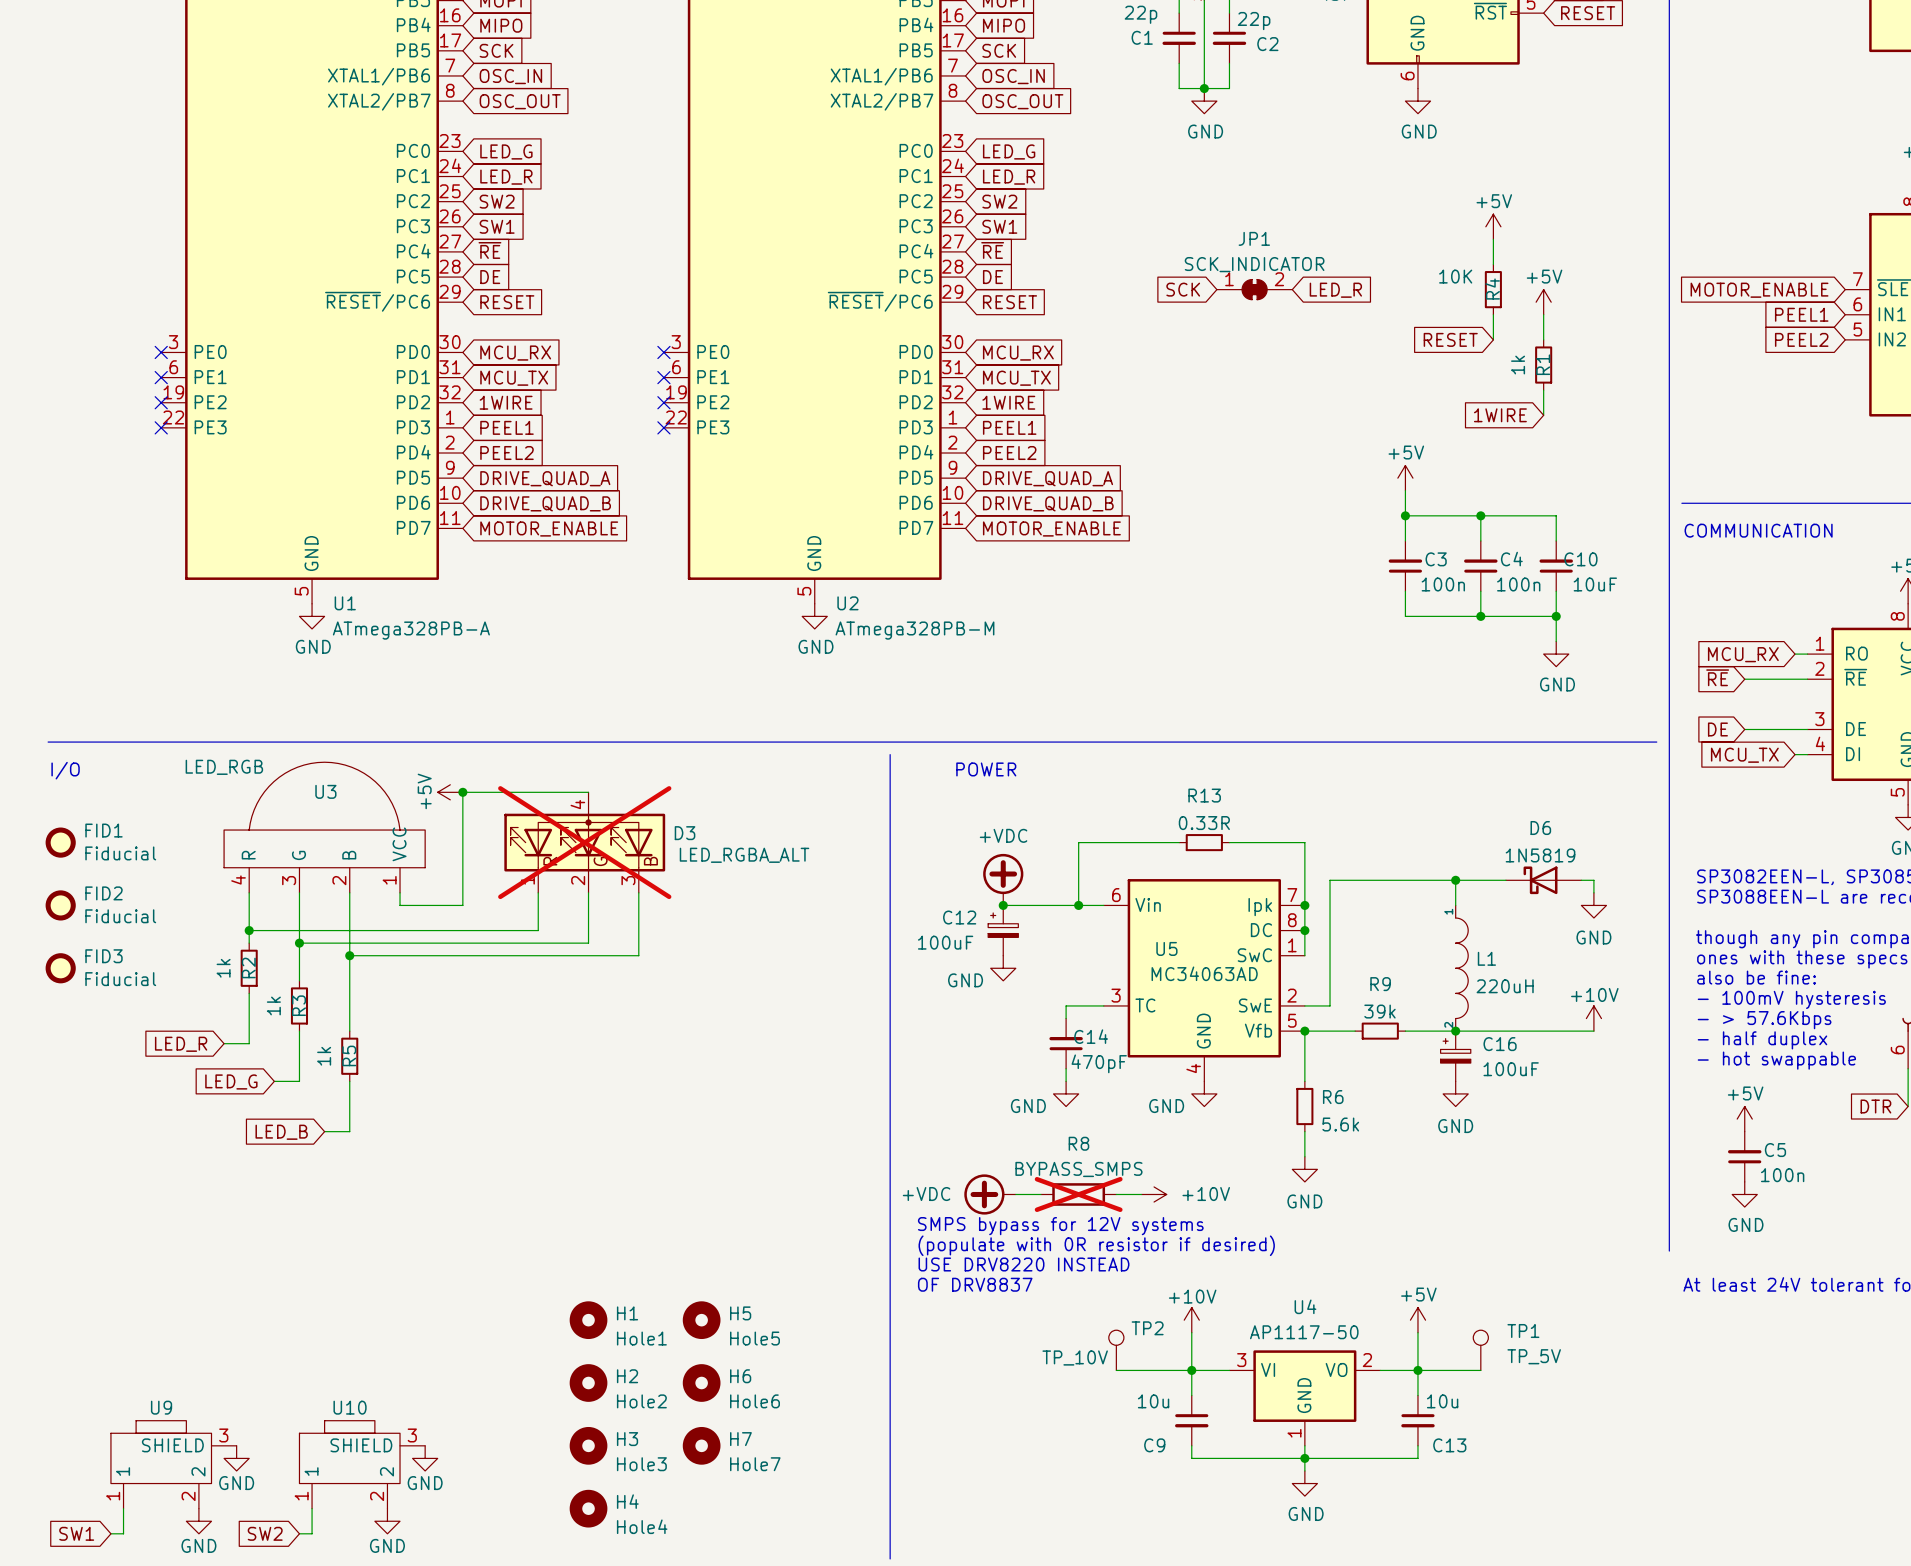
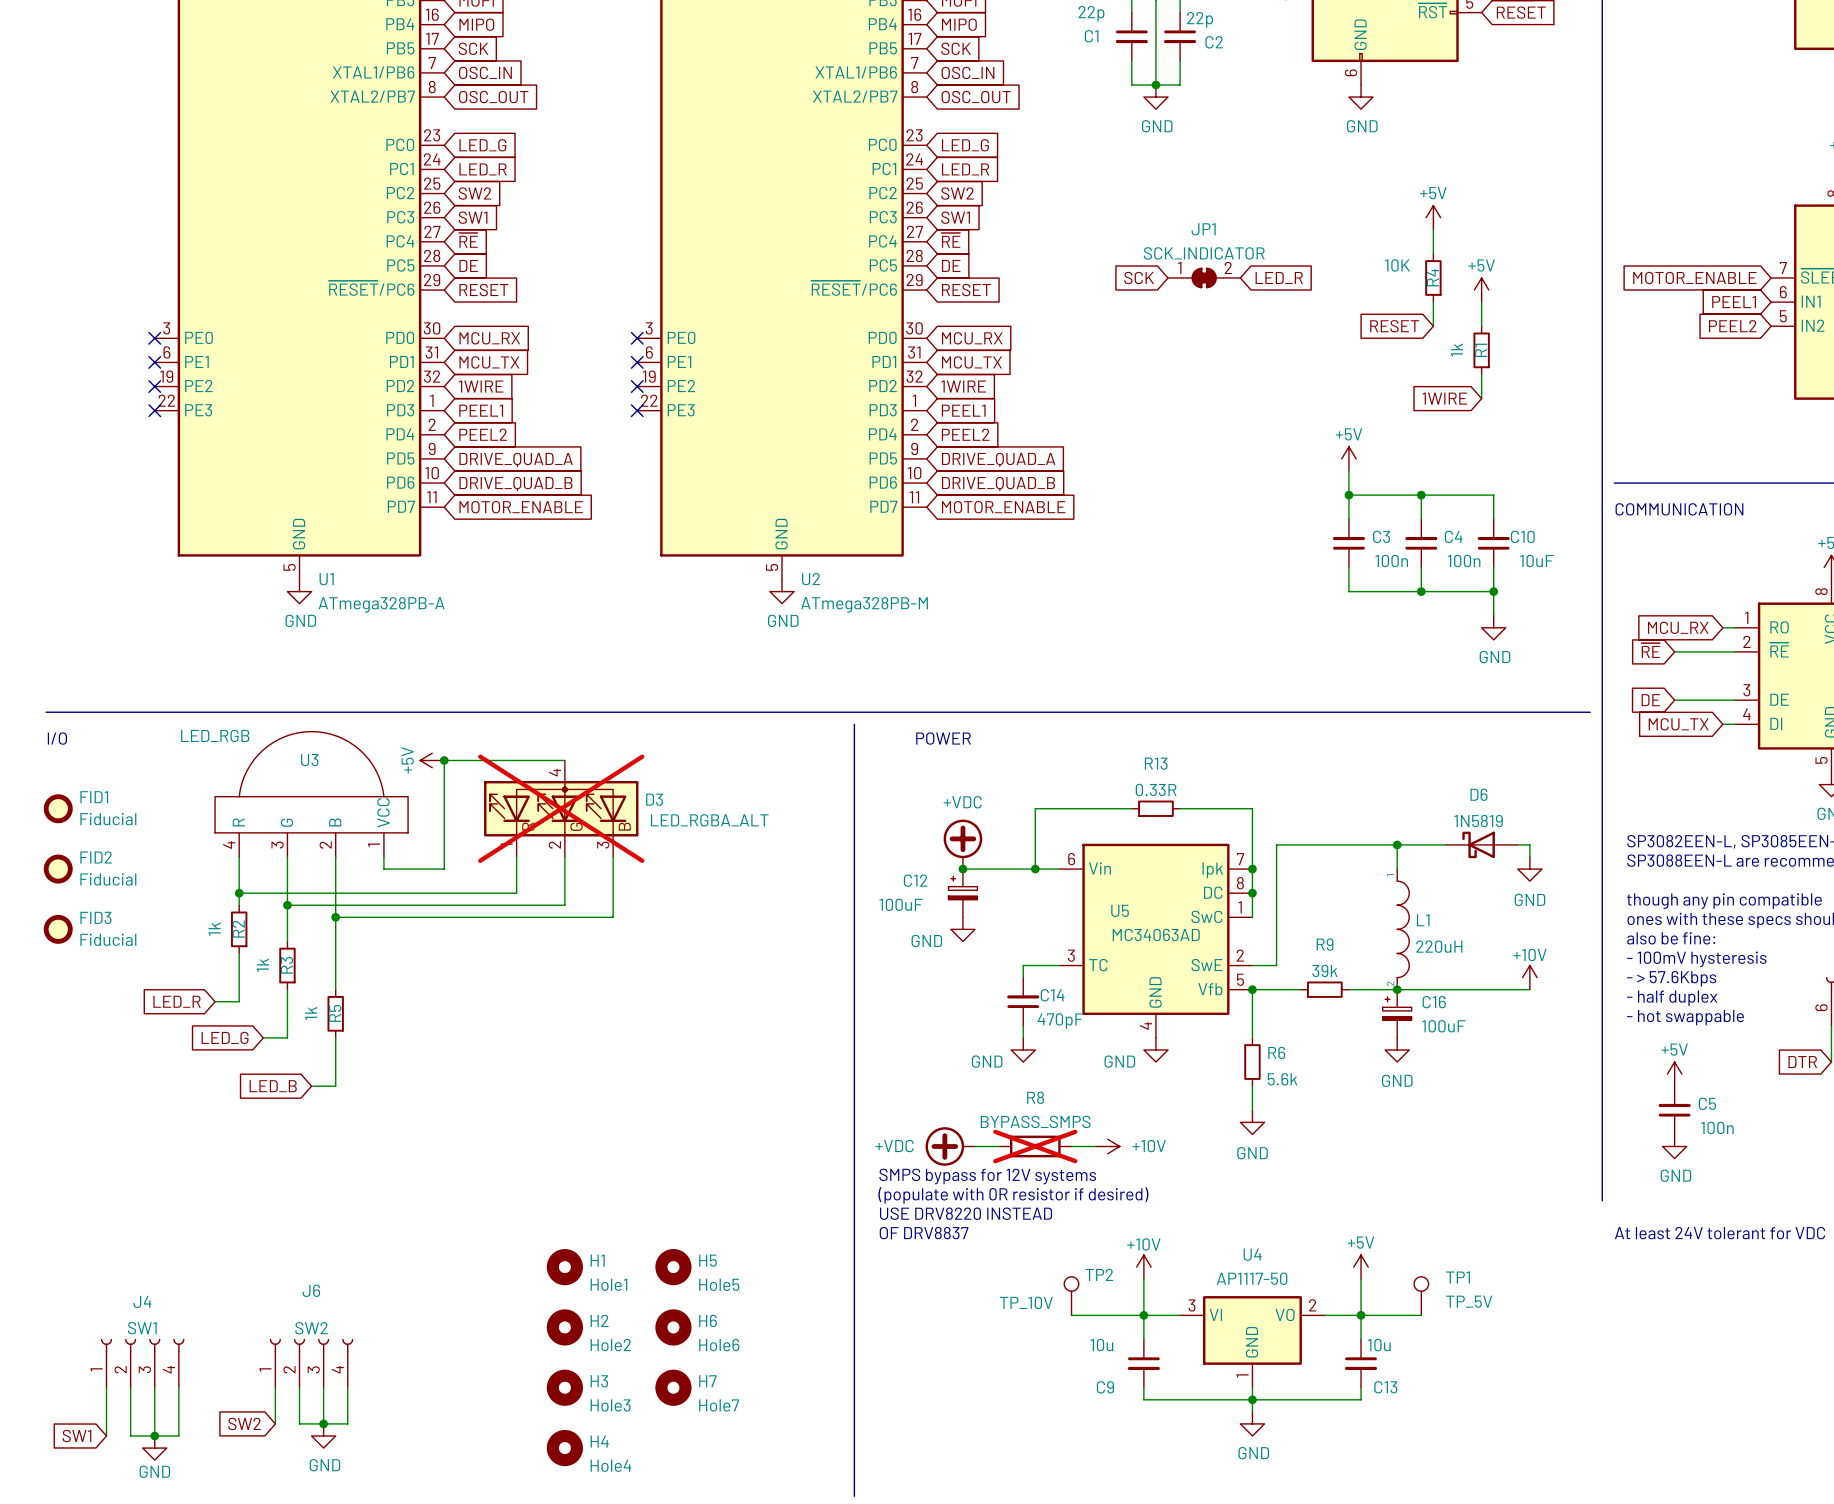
J4: none -> SW1 (142, 1363)
J6: none -> SW2 (311, 1363)
wire: none -> (130, 1387) (130, 1436) (178, 1436) (178, 1387)
wire: none -> (154, 1387) (154, 1436)
wire: none -> (275, 1387) (275, 1423)
wire: none -> (299, 1387) (299, 1423) (347, 1423) (347, 1387)
wire: none -> (323, 1387) (323, 1423)
power symbol: GND (236, 1458) -> none
power symbol: GND (425, 1458) -> none
U9: (173, 1464) -> none
U10: (362, 1464) -> none
junction: none -> (323, 1423)
junction: none -> (154, 1436)
power symbol: none -> GND (323, 1436)
wire: (123, 1508) (123, 1533) (110, 1533) -> none
wire: (312, 1508) (312, 1533) (299, 1533) -> none
power symbol position: GND (198, 1521) -> GND (154, 1448)
power symbol: GND (387, 1521) -> none
global label position: SW1 (76, 1533) -> SW1 (76, 1436)
global label position: SW2 (265, 1533) -> SW2 (244, 1423)

